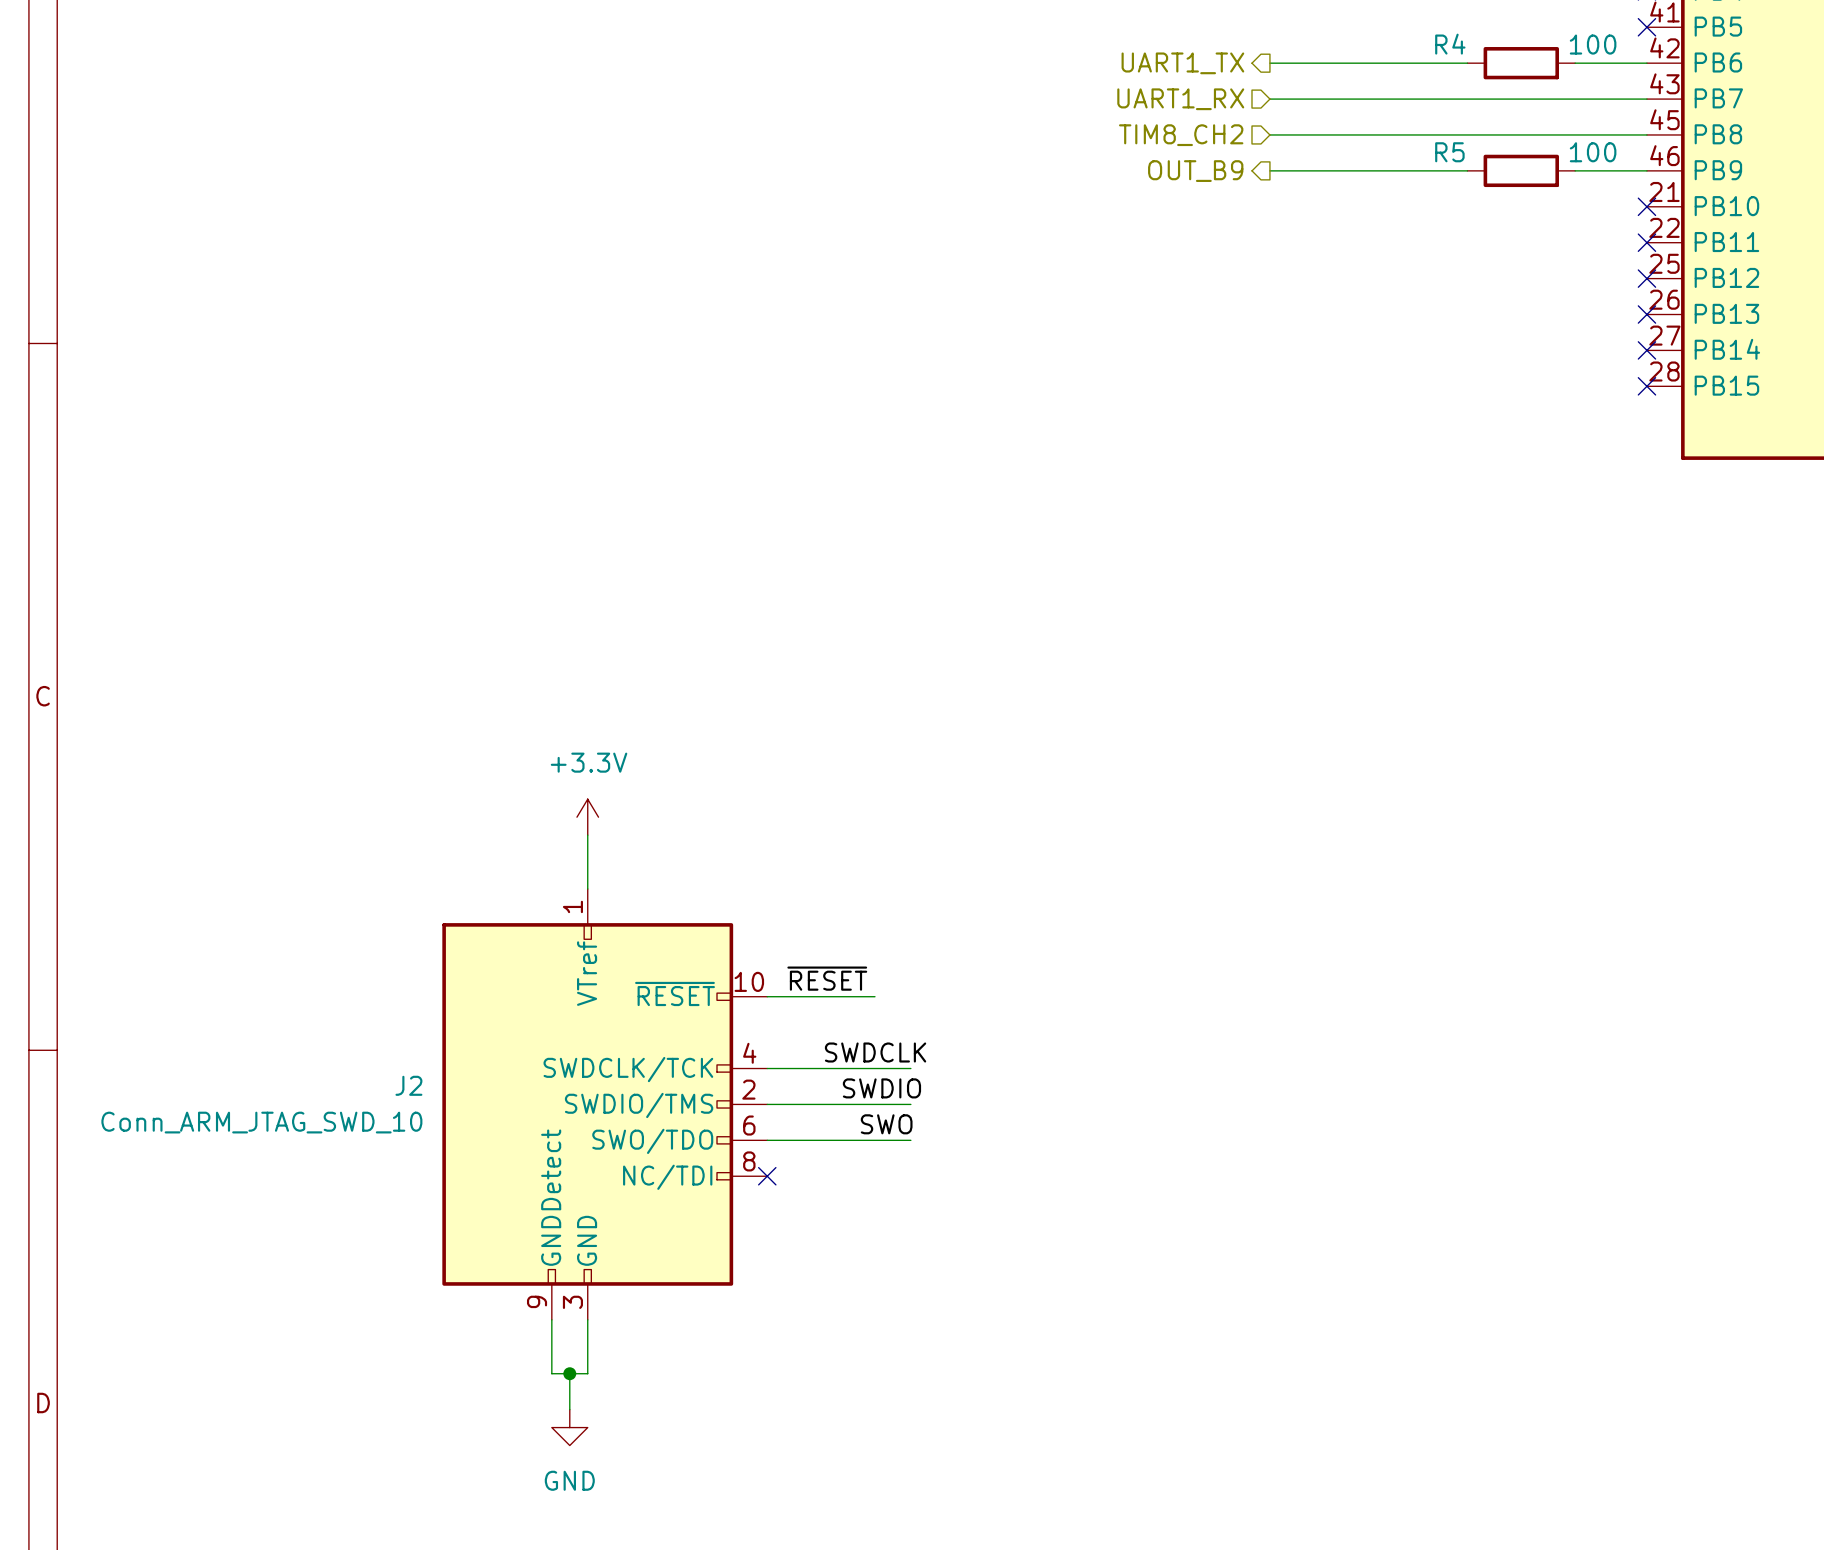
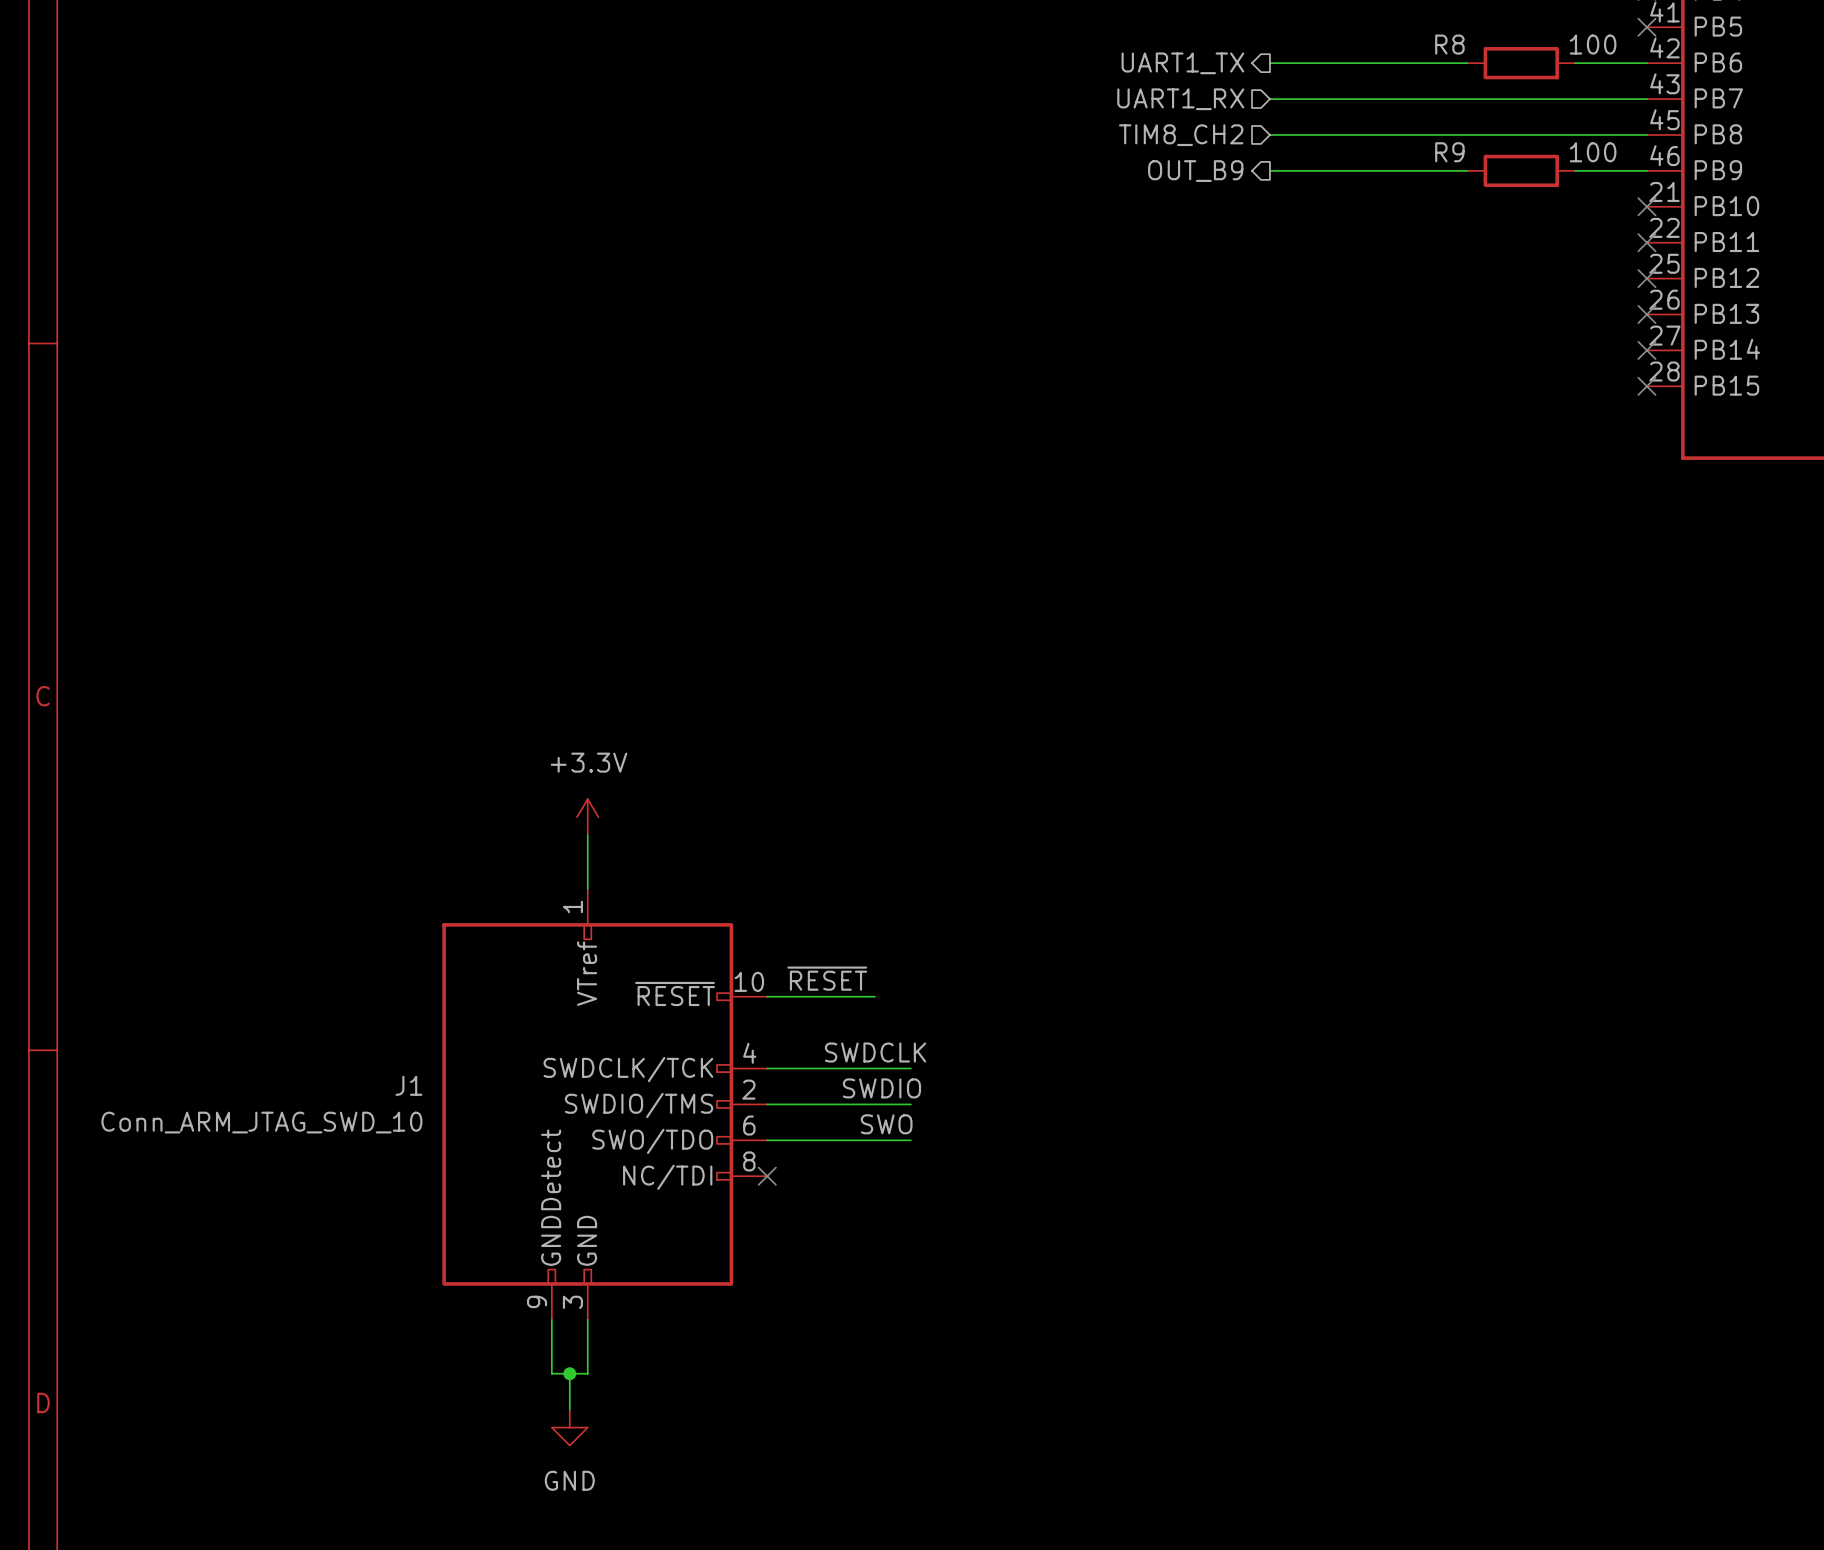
R4 name: R4 (1450, 44) -> R8 (1449, 44)
R5 name: R5 (1449, 152) -> R9 (1449, 152)
J2 name: J2 (408, 1085) -> J1 (408, 1085)

